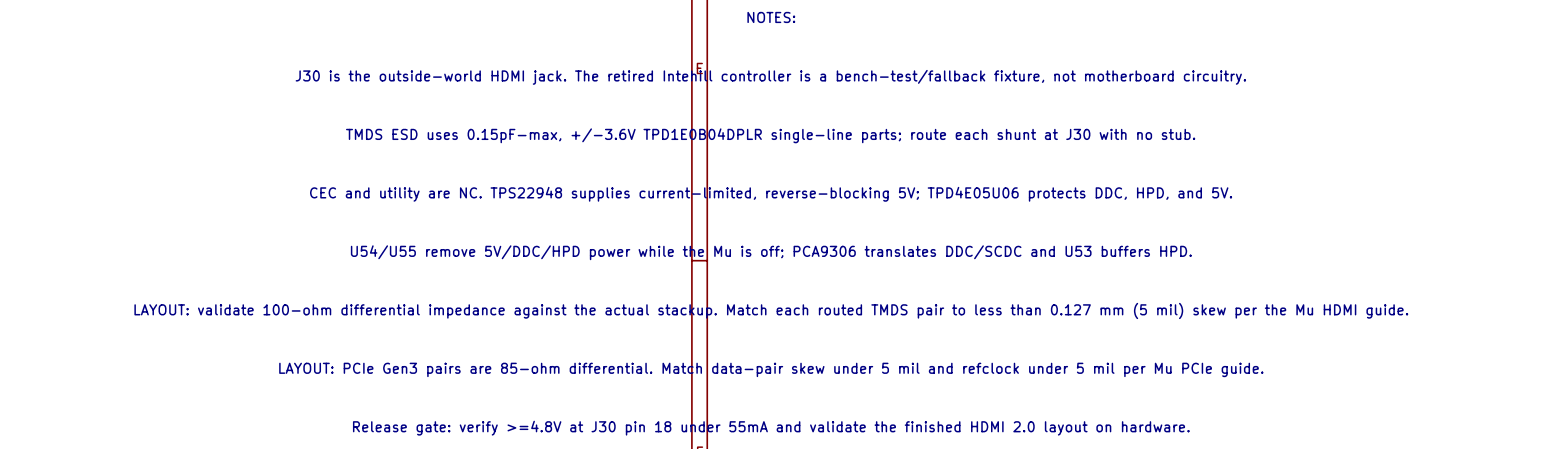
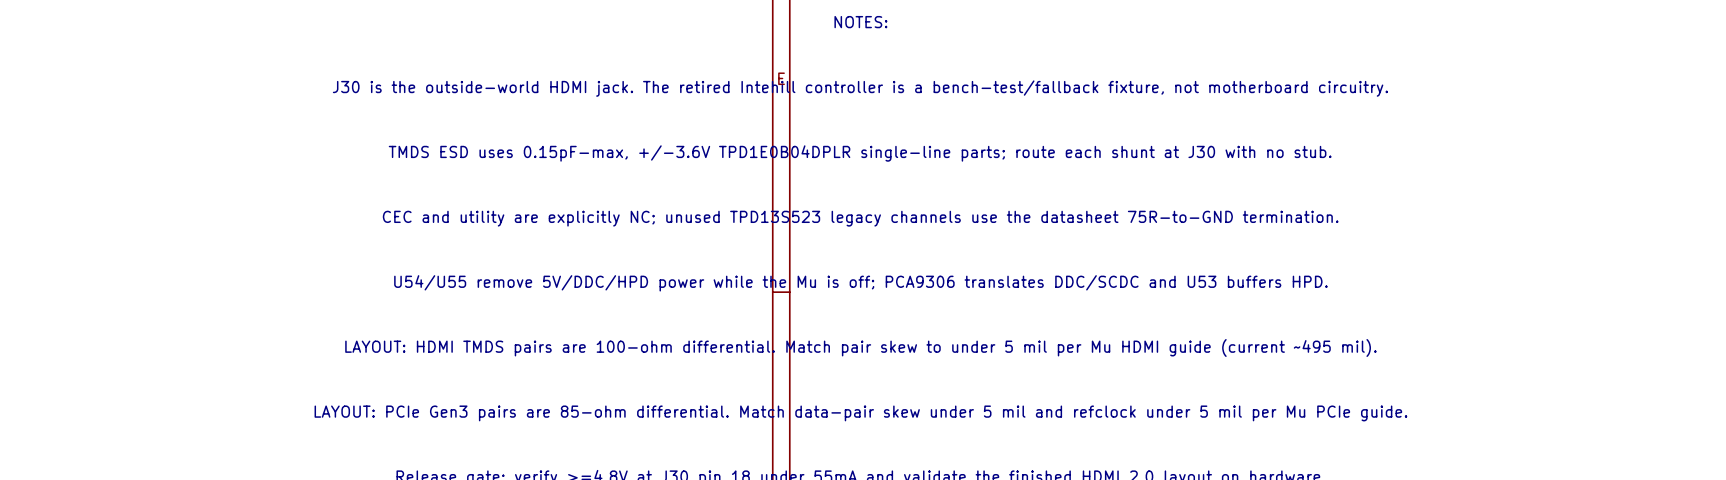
text: CEC and utility are NC. TPS22948 supplies current-limited, reverse-blocking 5V; TPD4E05U06 protects DDC, HPD, and 5V. (771, 194) -> CEC and utility are explicitly NC; unused TPD13S523 legacy channels use the datasheet 75R-to-GND termination. (860, 218)
text: LAYOUT: validate 100-ohm differential impedance against the actual stackup. Match each routed TMDS pair to less than 0.127 mm (5 mil) skew per the Mu HDMI guide. (771, 310) -> LAYOUT: HDMI TMDS pairs are 100-ohm differential. Match pair skew to under 5 mil per Mu HDMI guide (current ~495 mil). (860, 347)

